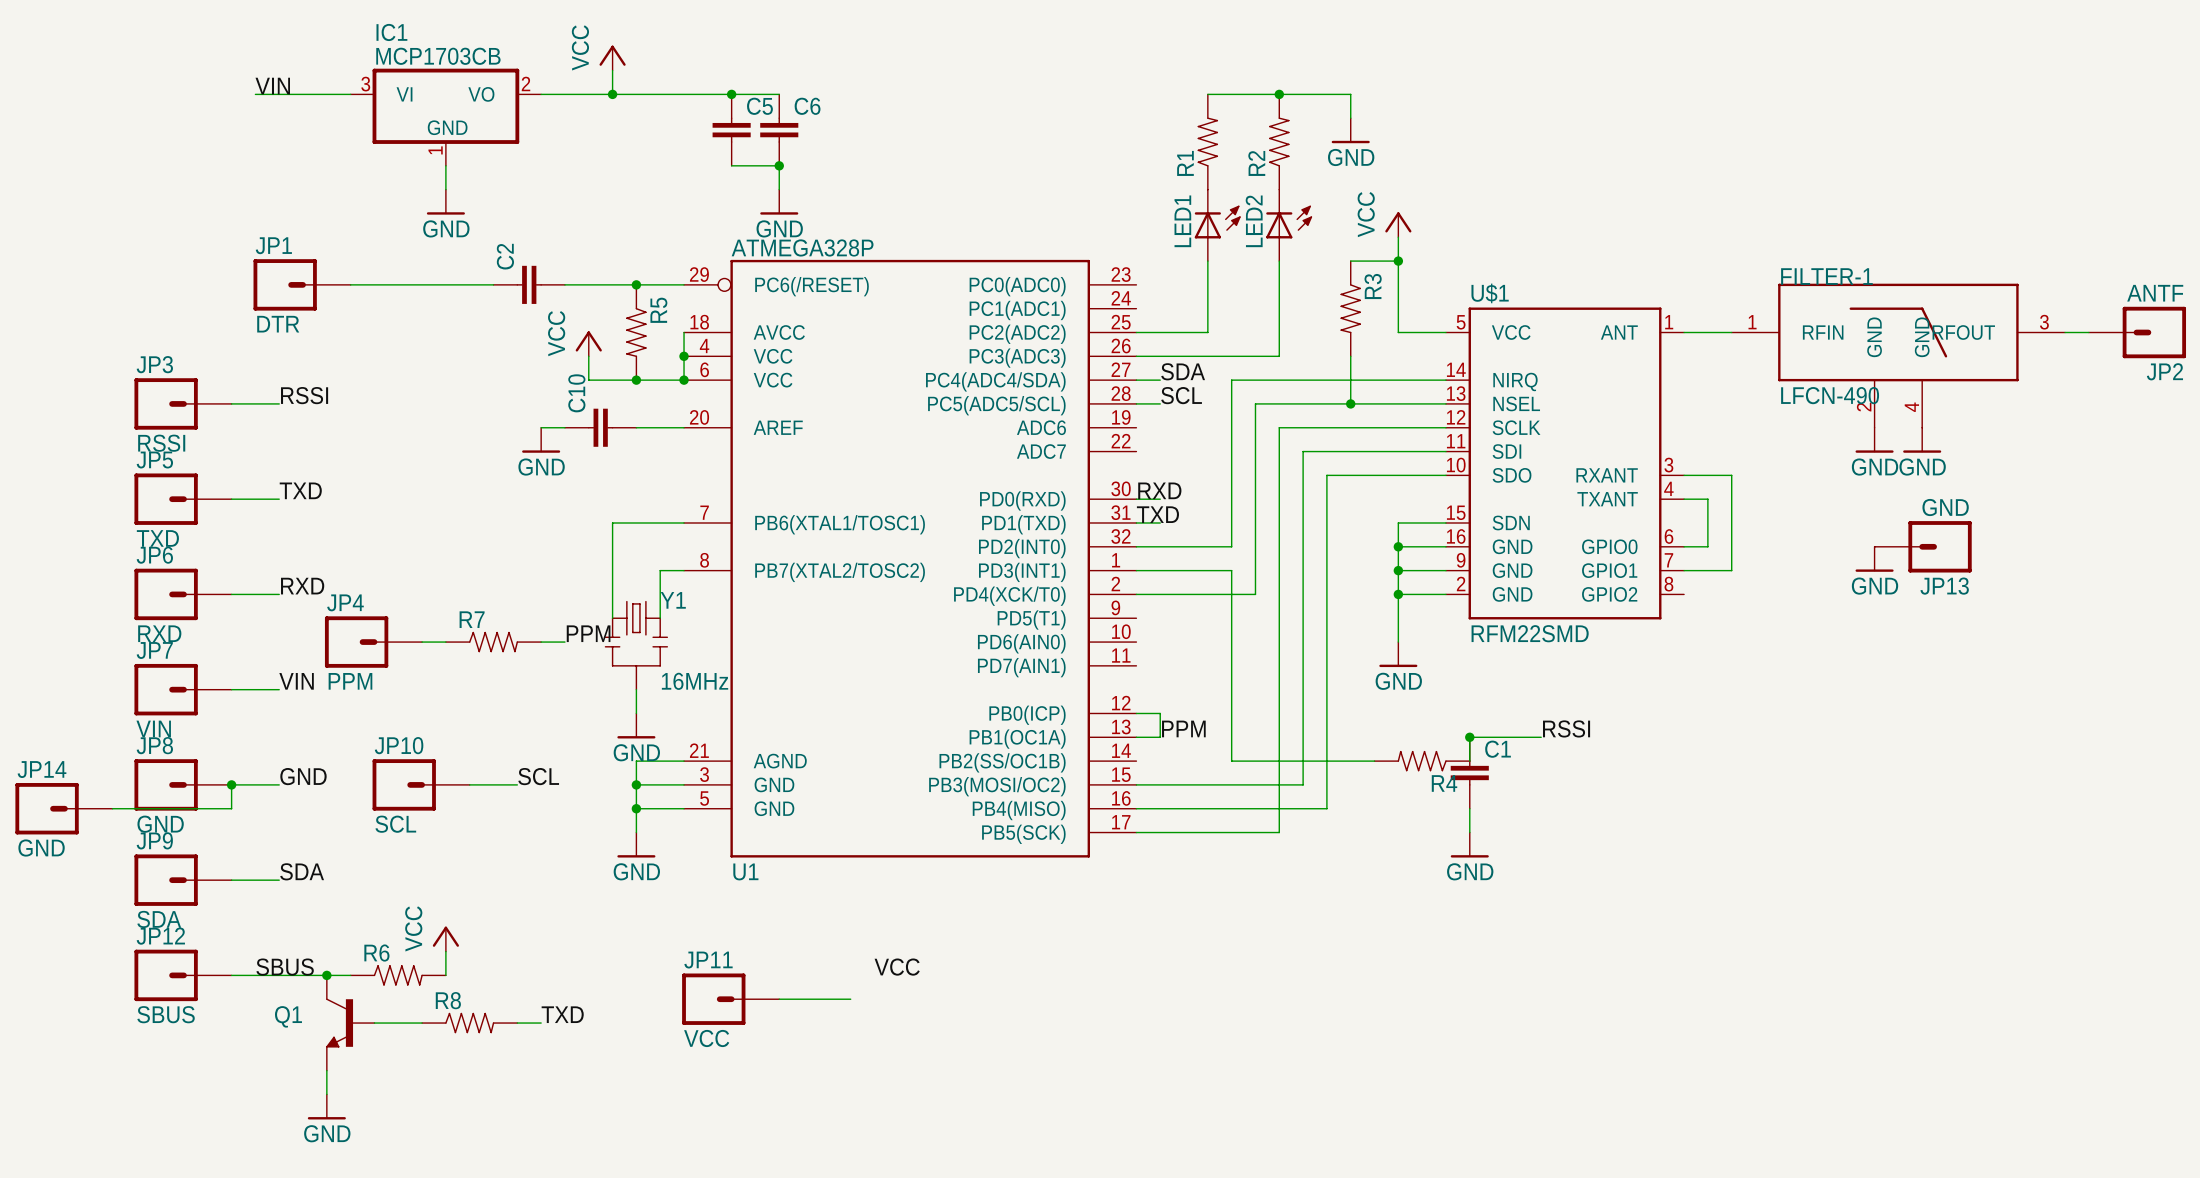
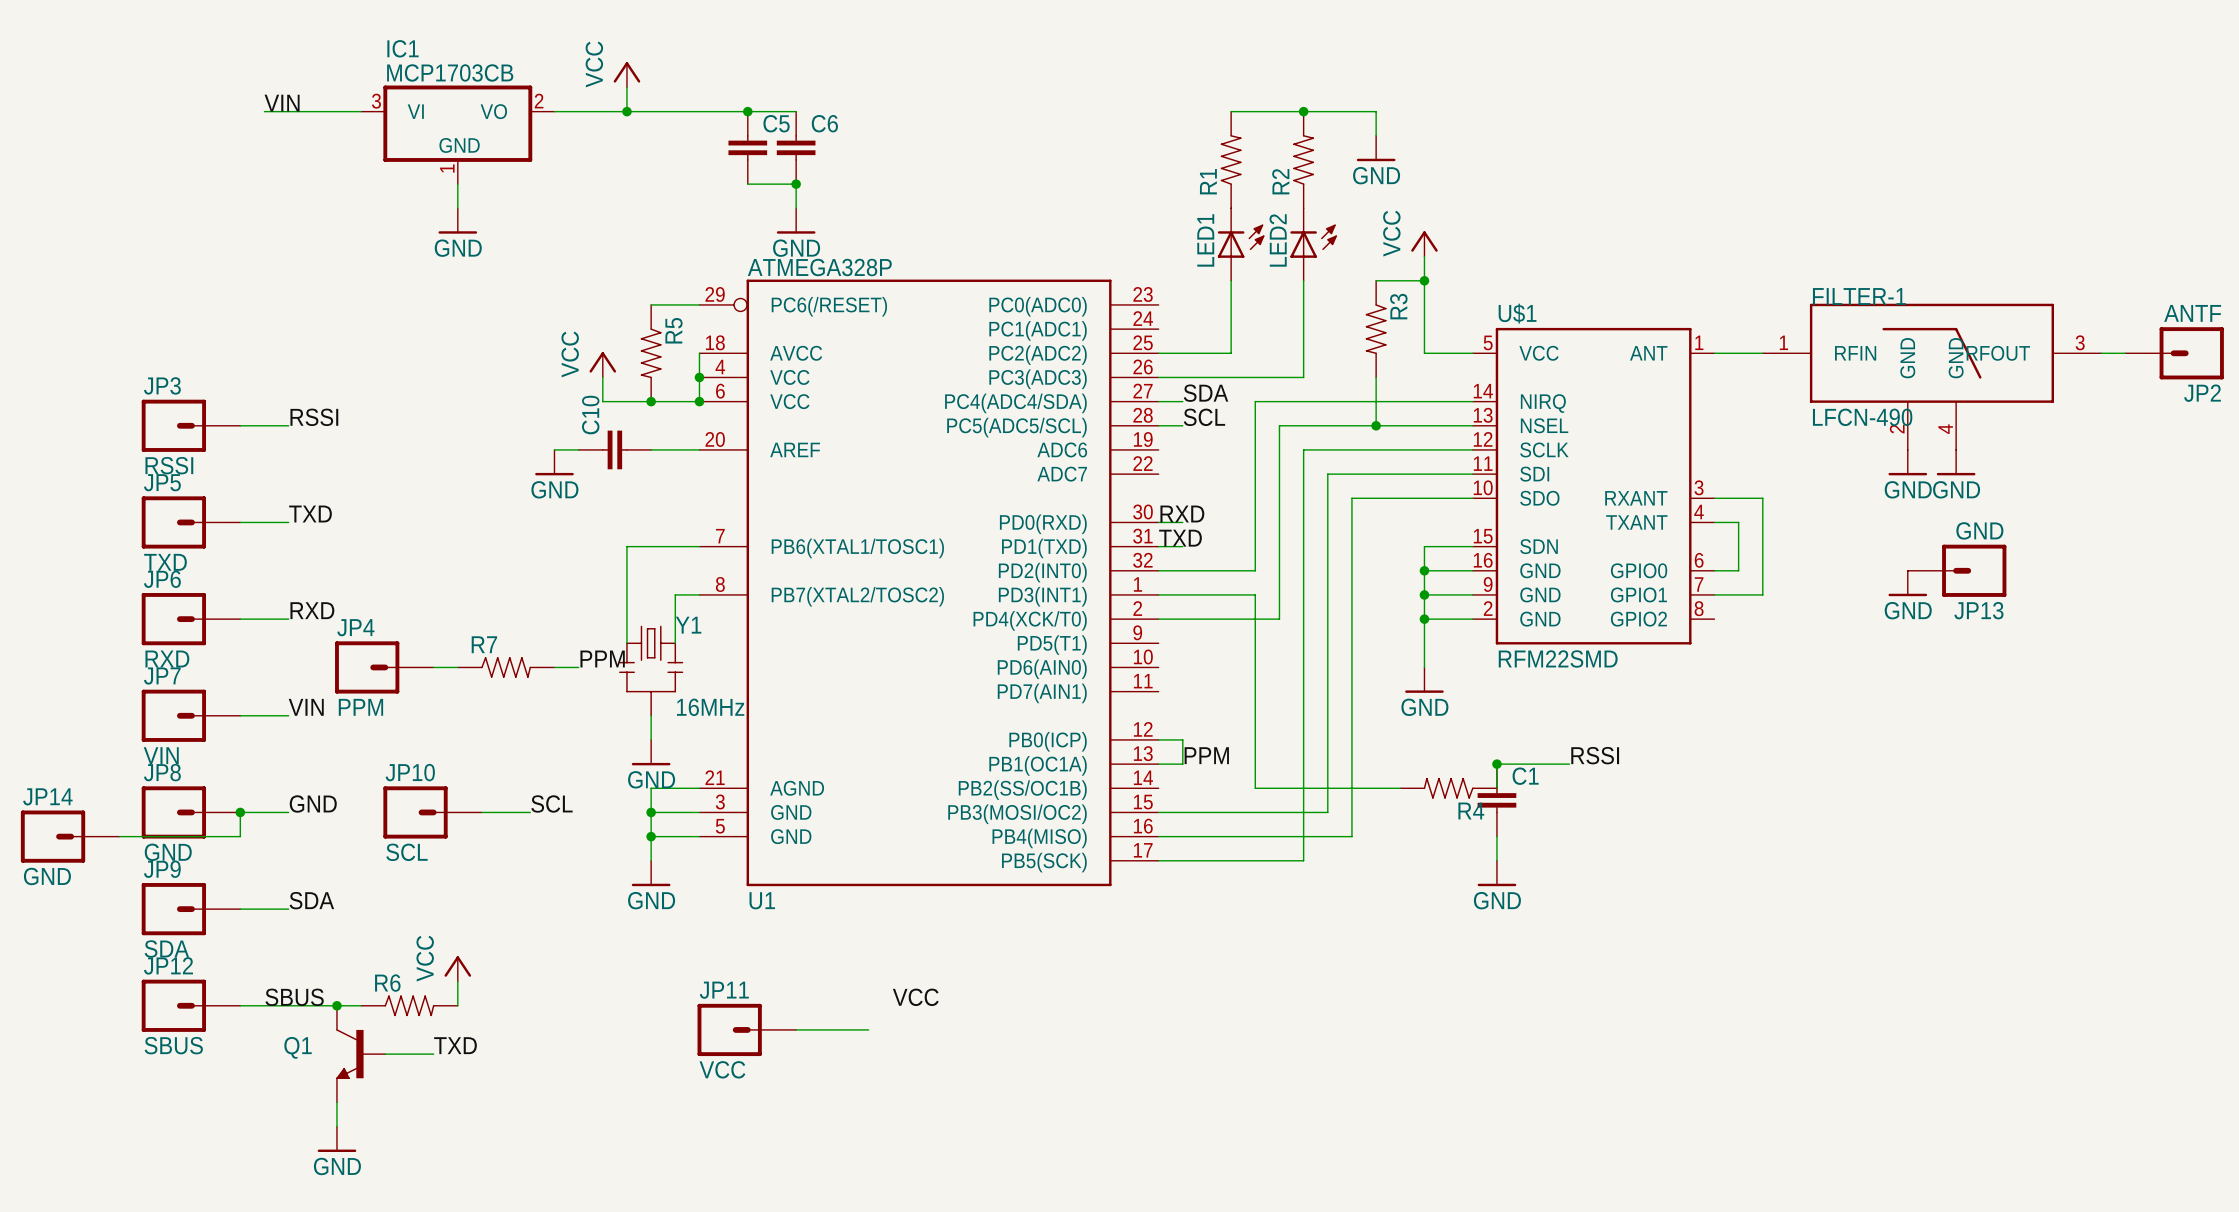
JP1: DTR (302, 284) -> none
wire: (350, 284) (493, 284) -> none
C2: (529, 284) -> none
wire: (564, 284) (636, 284) -> none
junction: (636, 284) -> none
label position: TXD (562, 1014) -> TXD (455, 1045)
R8: (469, 1023) -> none
wire: (517, 1023) (541, 1023) -> none

